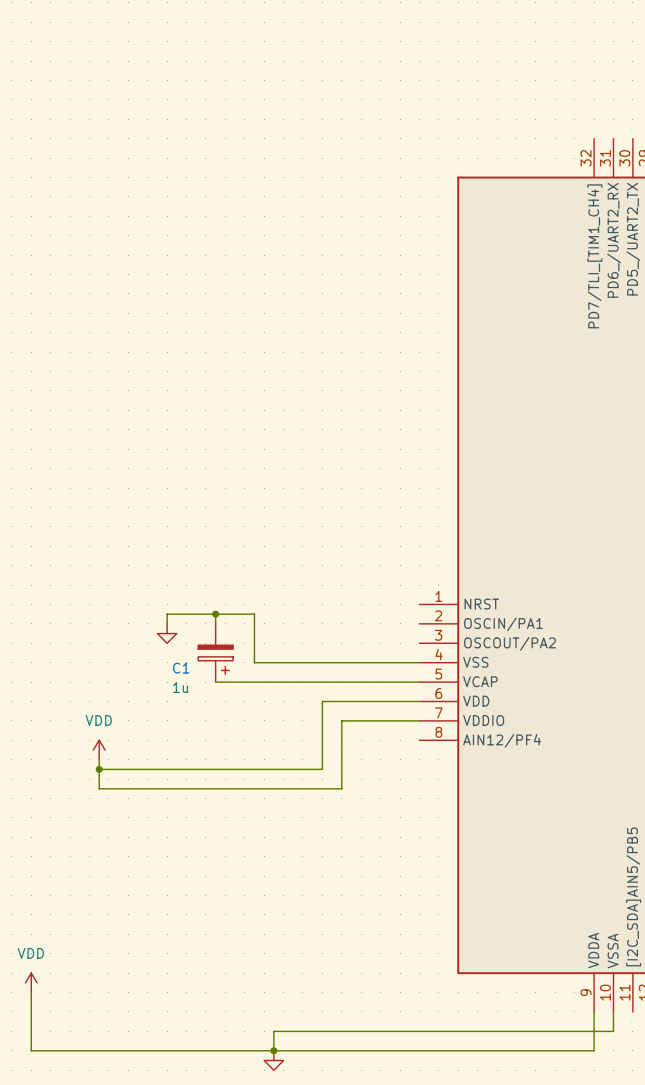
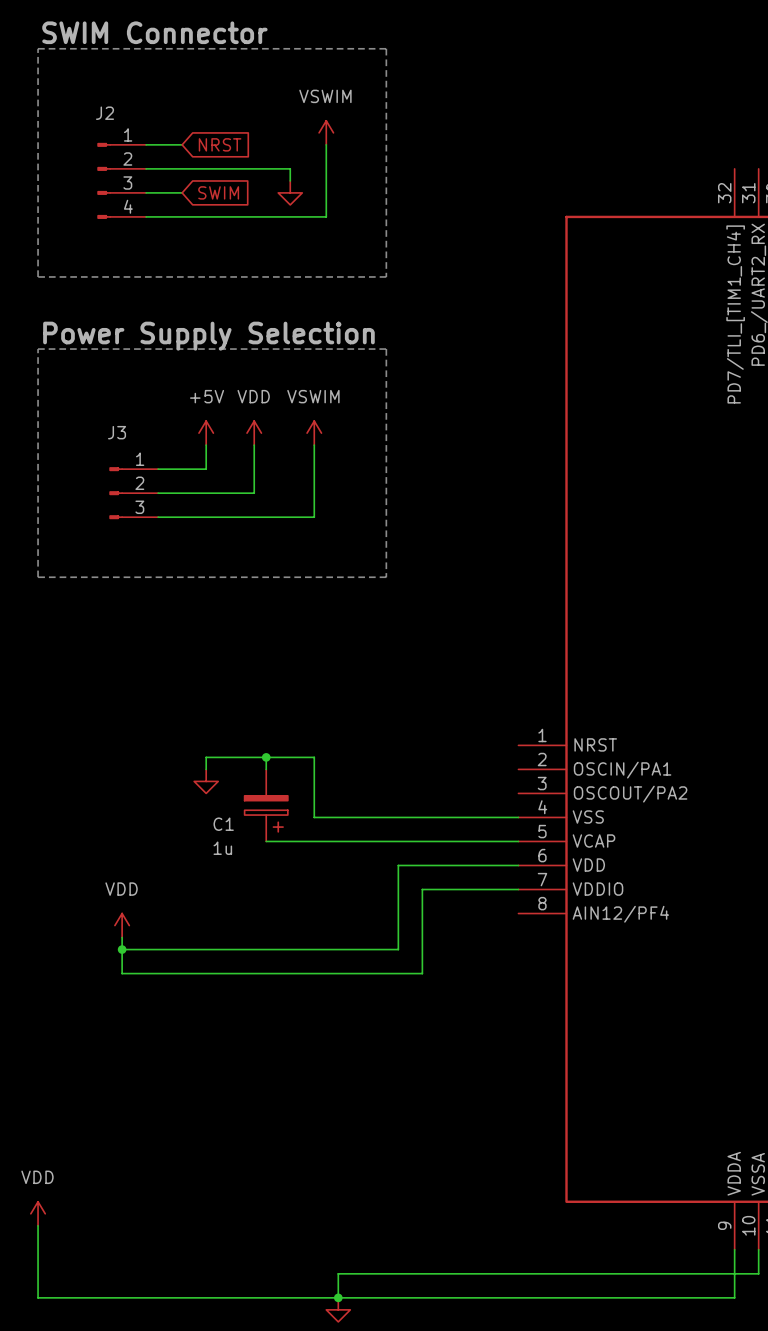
label: none -> SWIM Connector (154, 32)
line: none -> (38, 48) (38, 276) (386, 276) (386, 48) (38, 48)
power symbol: none -> VSWIM (326, 132)
wire: none -> (146, 144) (182, 144)
global label: none -> NRST (220, 144)
wire: none -> (326, 144) (326, 216) (146, 216)
wire: none -> (146, 168) (290, 168) (290, 180)
J2: none -> (121, 180)
wire: none -> (146, 192) (182, 192)
global label: none -> SWIM (218, 192)
power symbol: none -> (290, 192)
label: none -> Power Supply Selection (208, 336)
line: none -> (38, 349) (386, 349) (386, 577) (38, 577) (38, 349)
power symbol: none -> +5V (206, 433)
power symbol: none -> VDD (254, 433)
power symbol: none -> VSWIM (314, 433)
wire: none -> (206, 445) (206, 469) (158, 469)
wire: none -> (254, 445) (254, 493) (158, 493)
wire: none -> (314, 445) (314, 517) (158, 517)
J3: none -> (133, 493)

